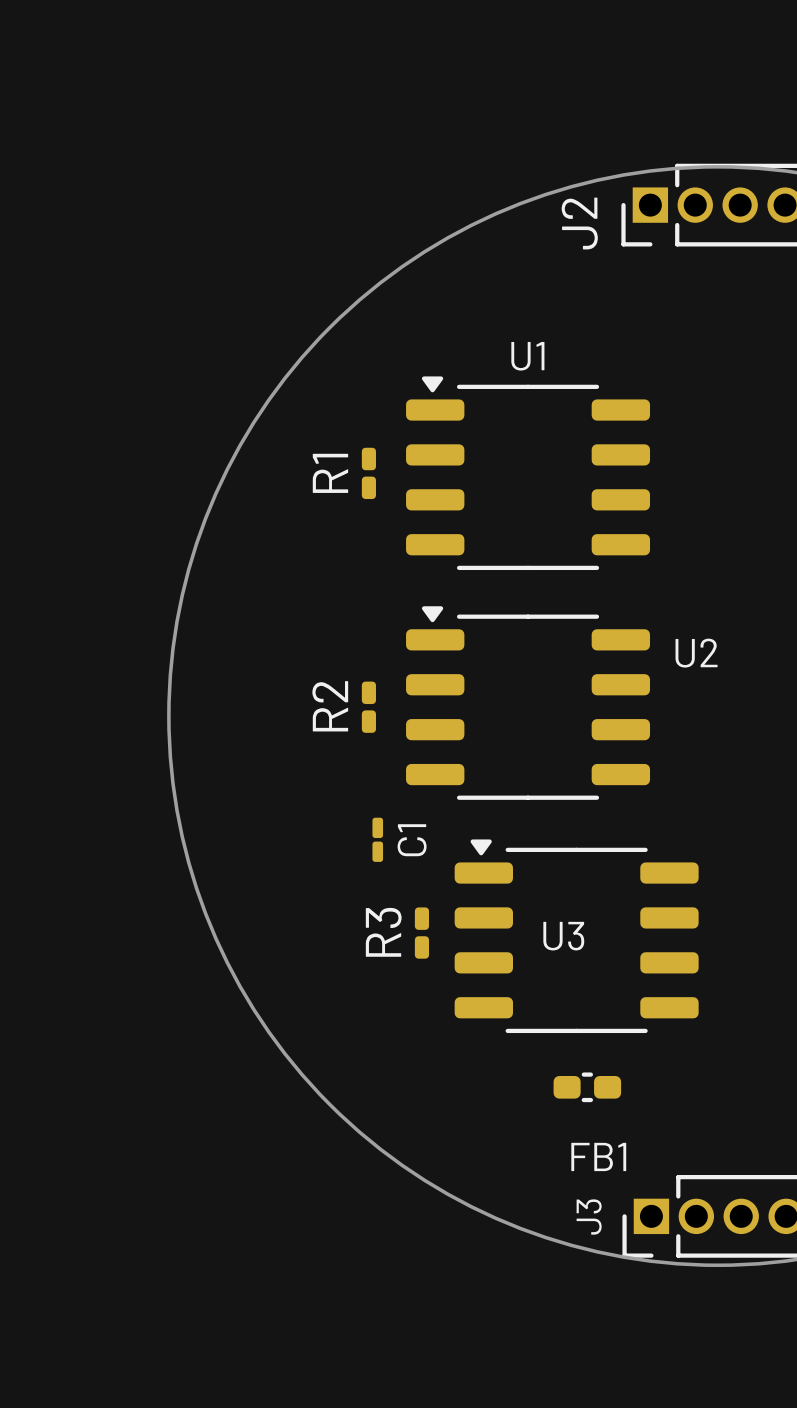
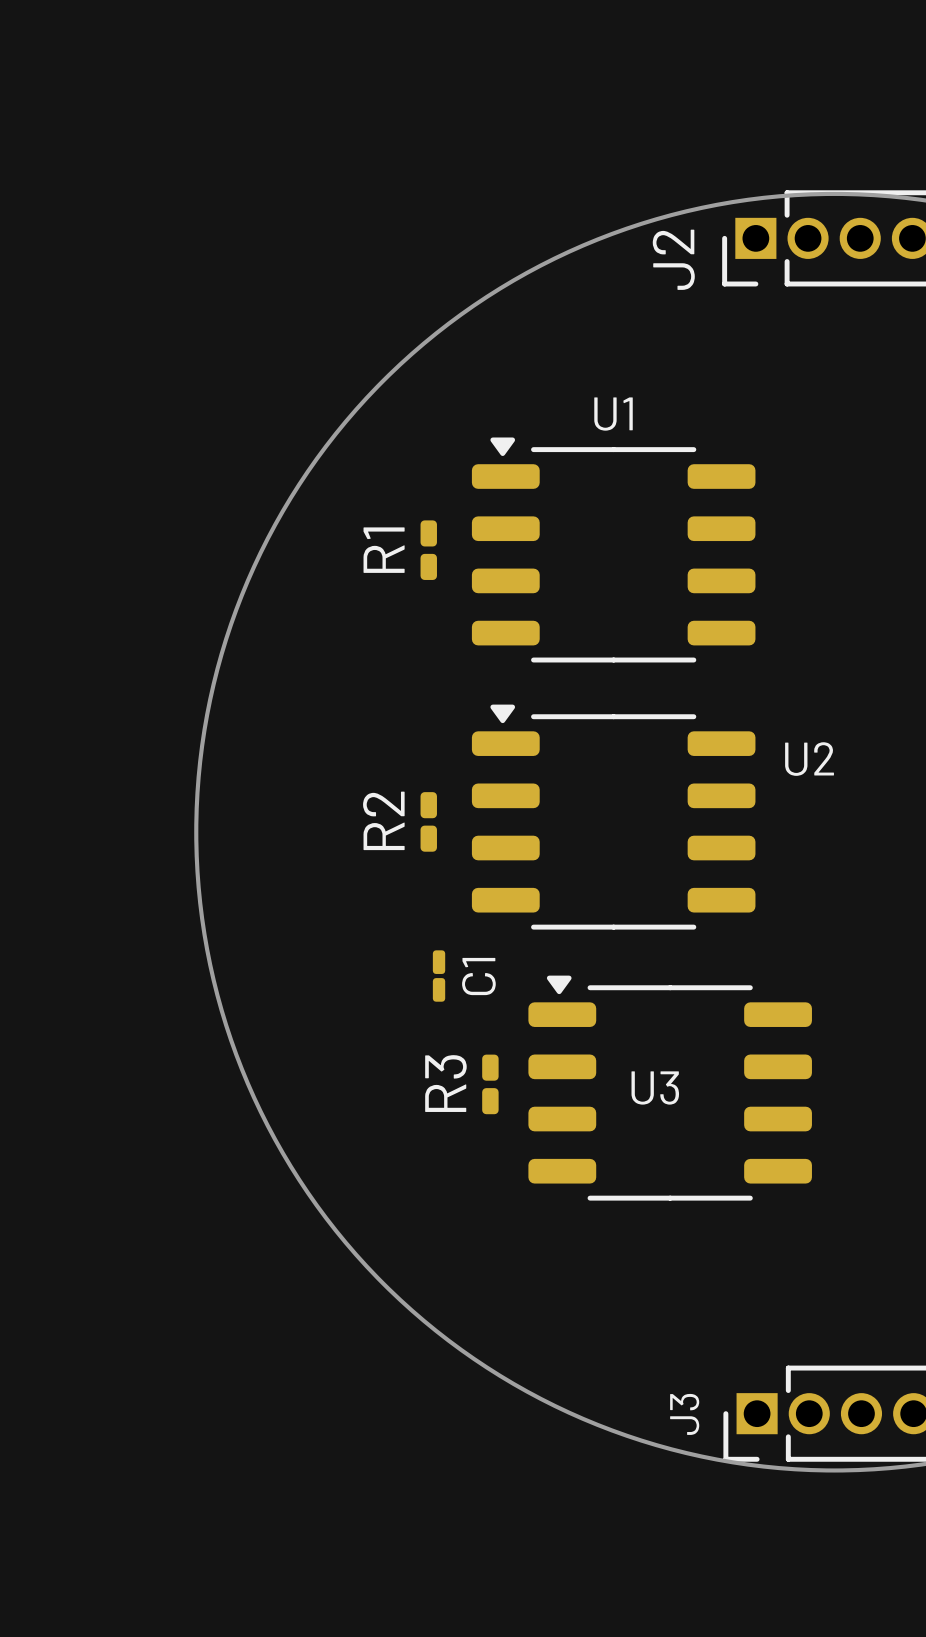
FB1: (587, 1087) -> none

